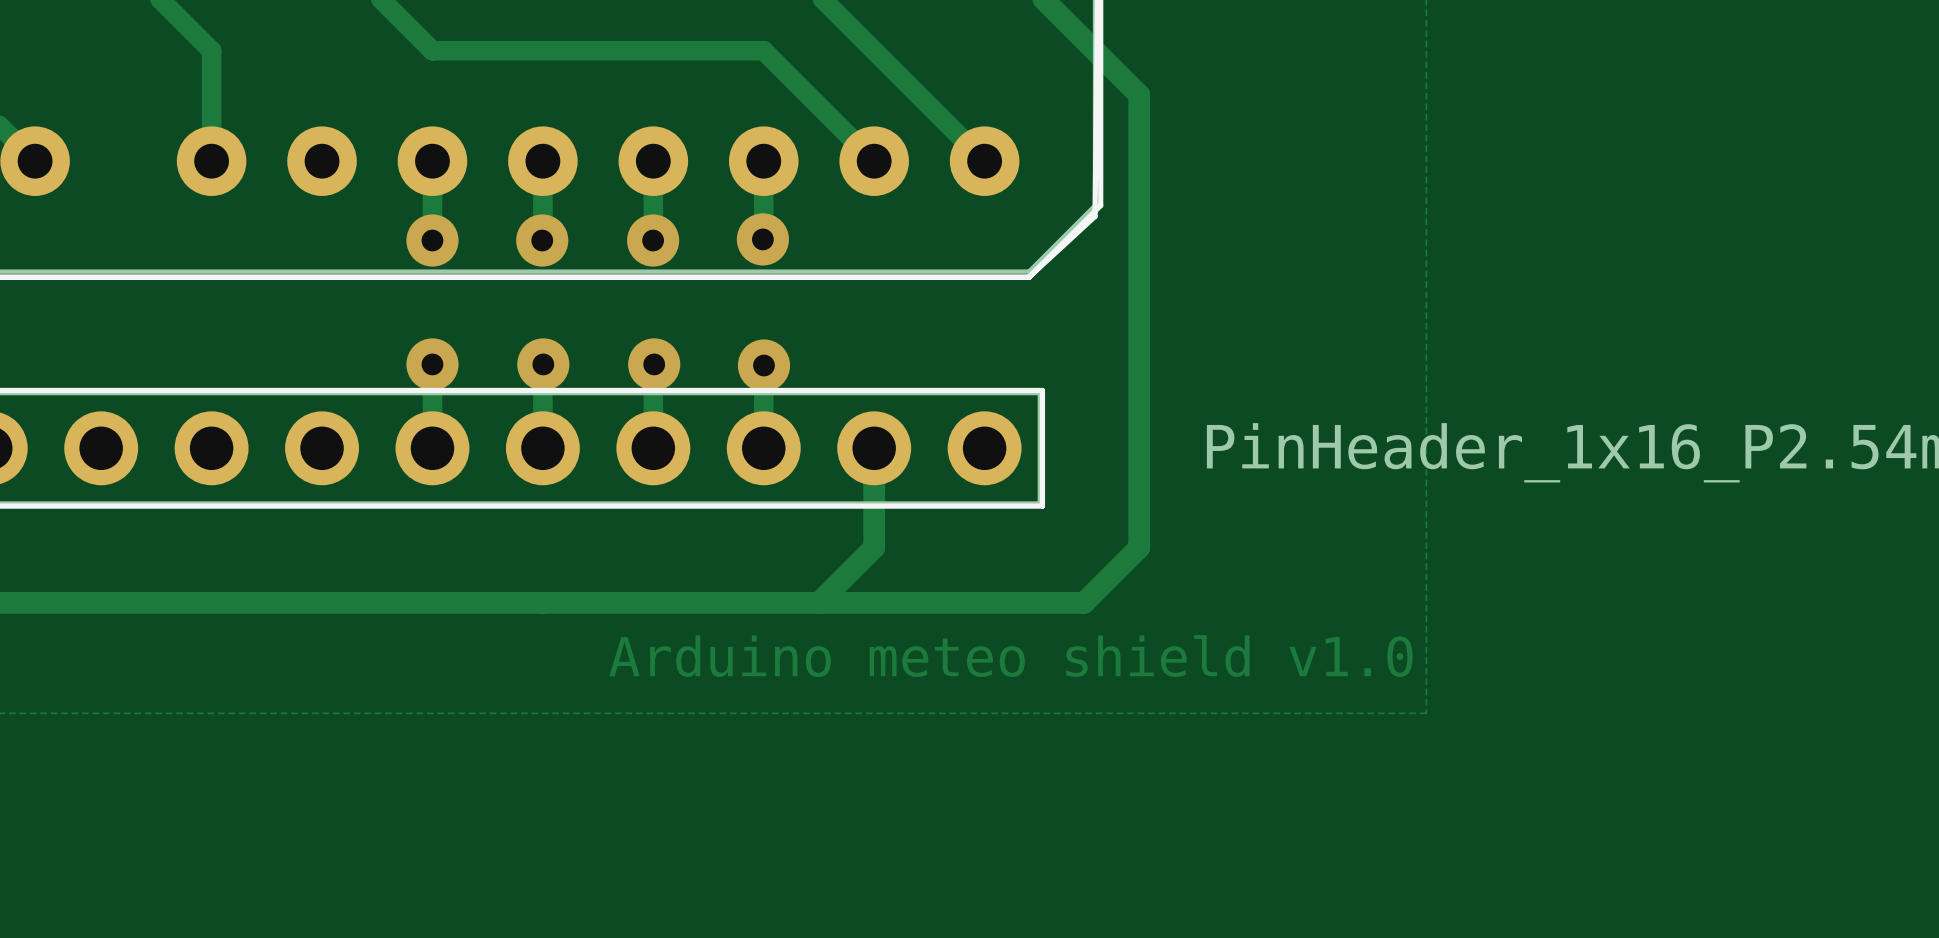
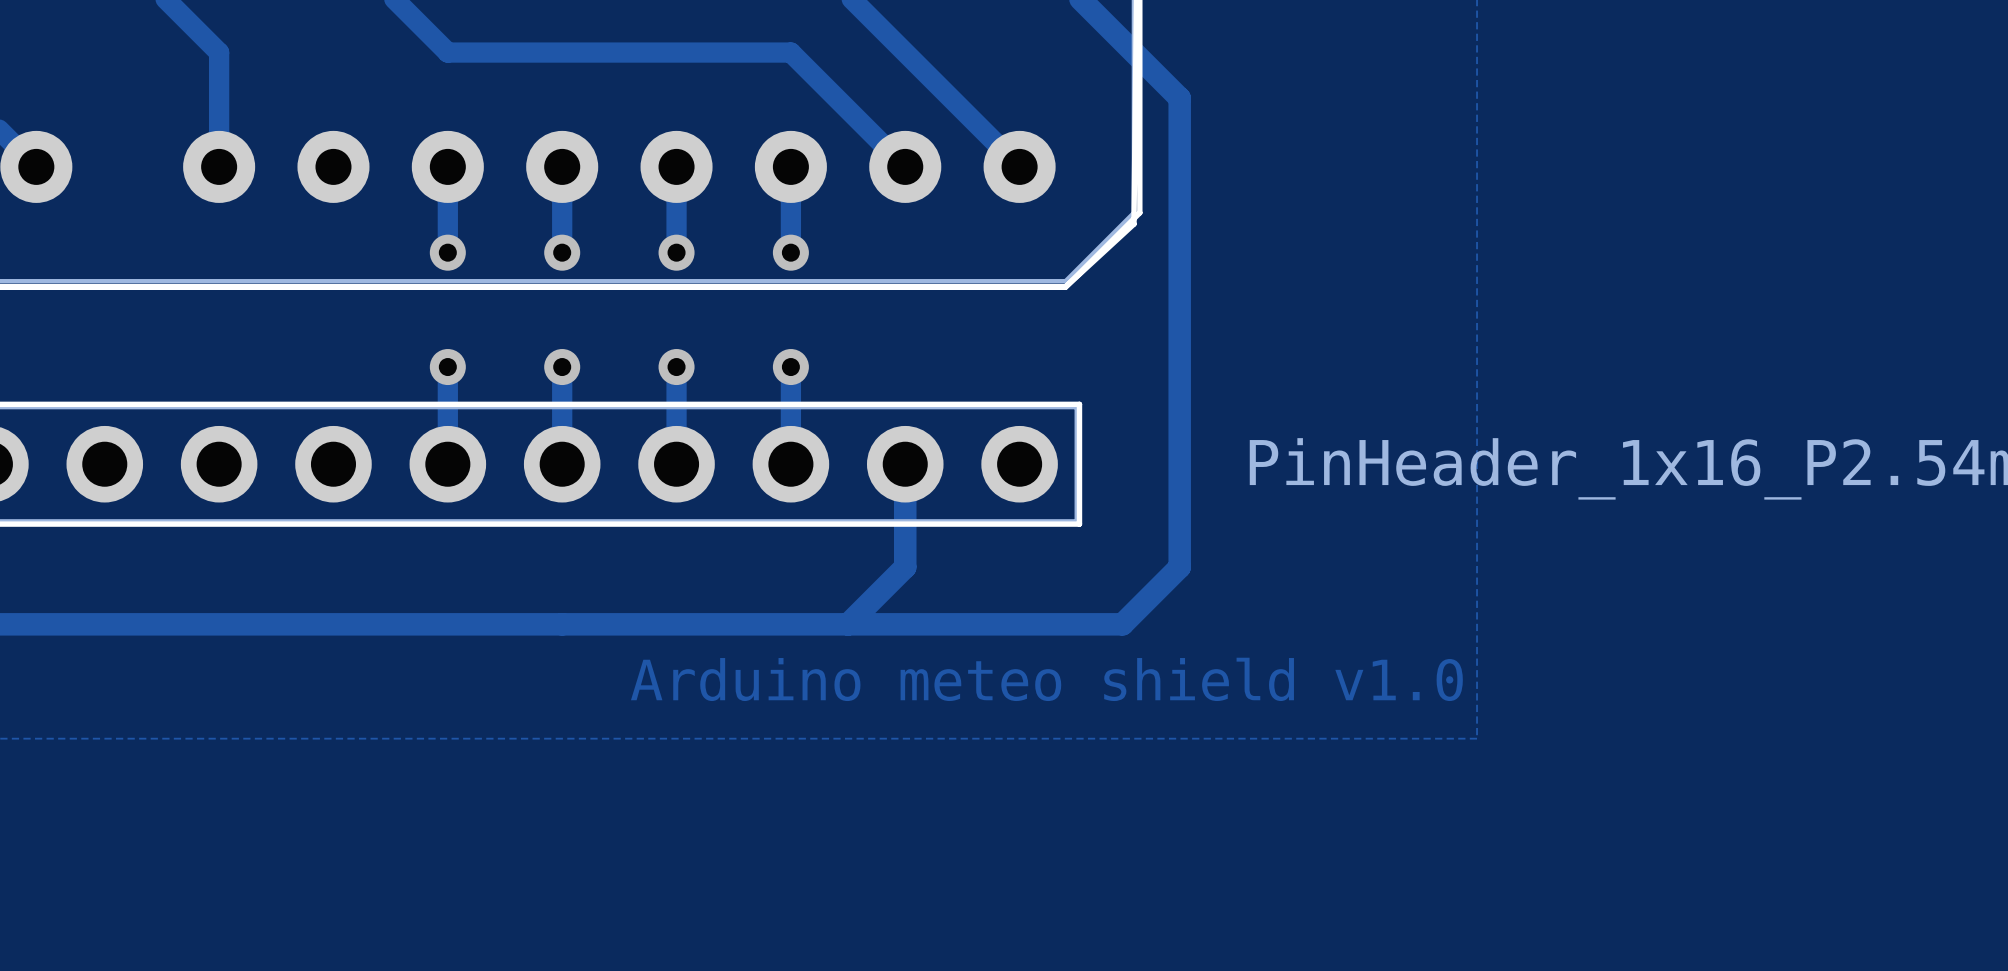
via size: [736, 213, 789, 266] -> [772, 234, 809, 271]
via size: [406, 214, 459, 267] -> [429, 234, 466, 271]
via size: [516, 214, 569, 267] -> [544, 234, 581, 271]
via size: [627, 214, 680, 267] -> [658, 234, 695, 271]
via size: [406, 338, 459, 391] -> [429, 349, 466, 386]
via size: [517, 338, 570, 391] -> [544, 349, 581, 386]
via size: [628, 338, 681, 391] -> [658, 349, 695, 386]
via size: [737, 339, 791, 392] -> [772, 349, 809, 386]

